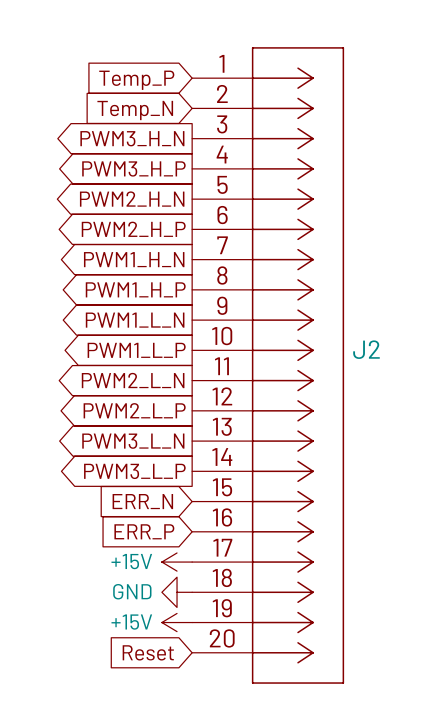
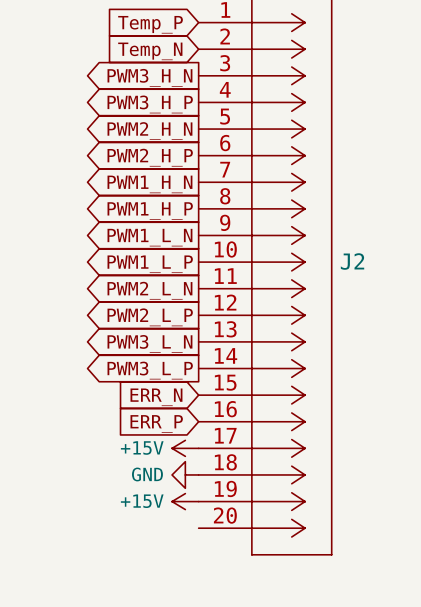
global label: Reset (148, 652) -> none

